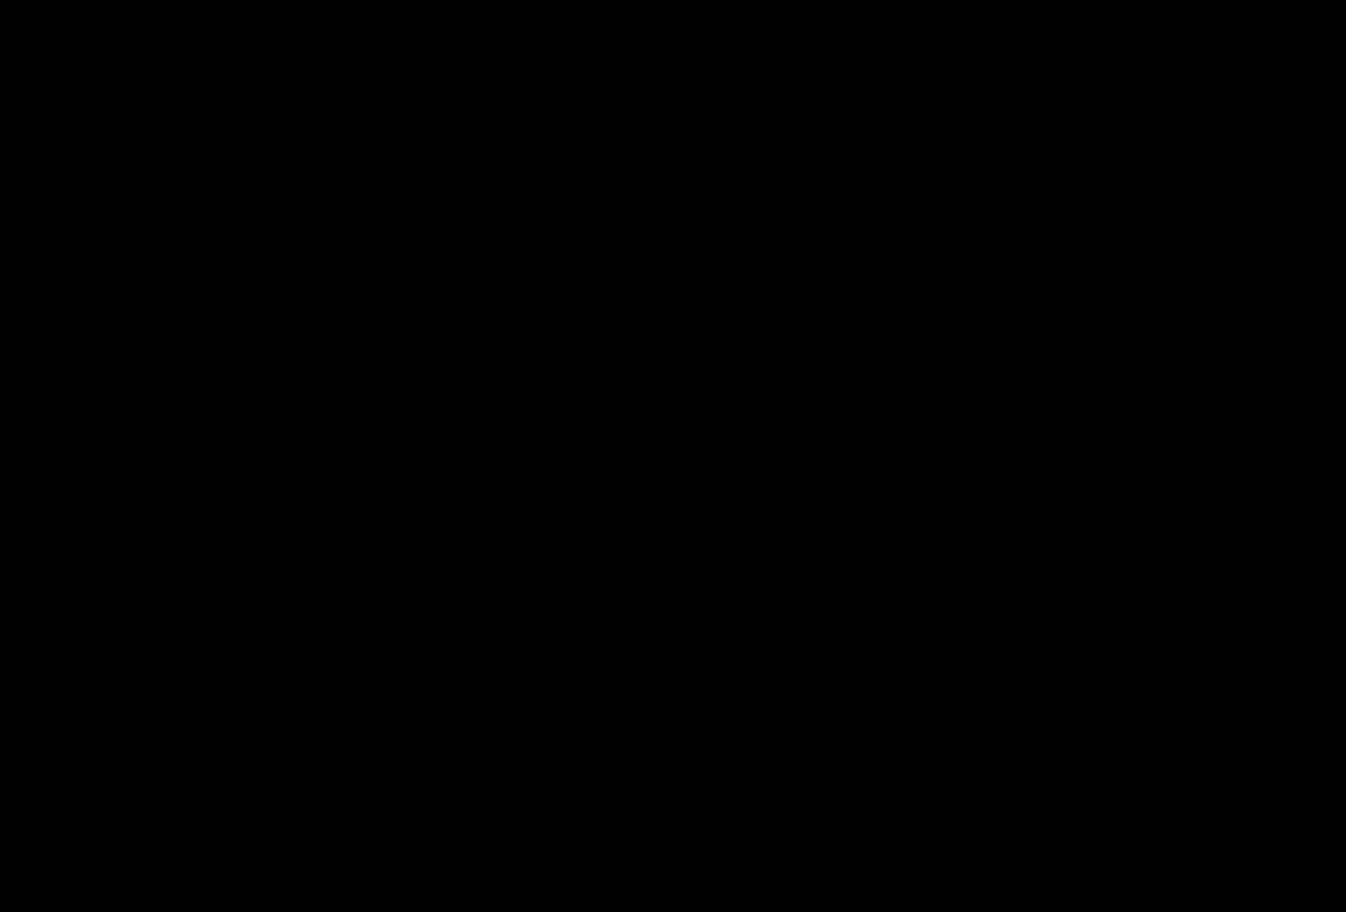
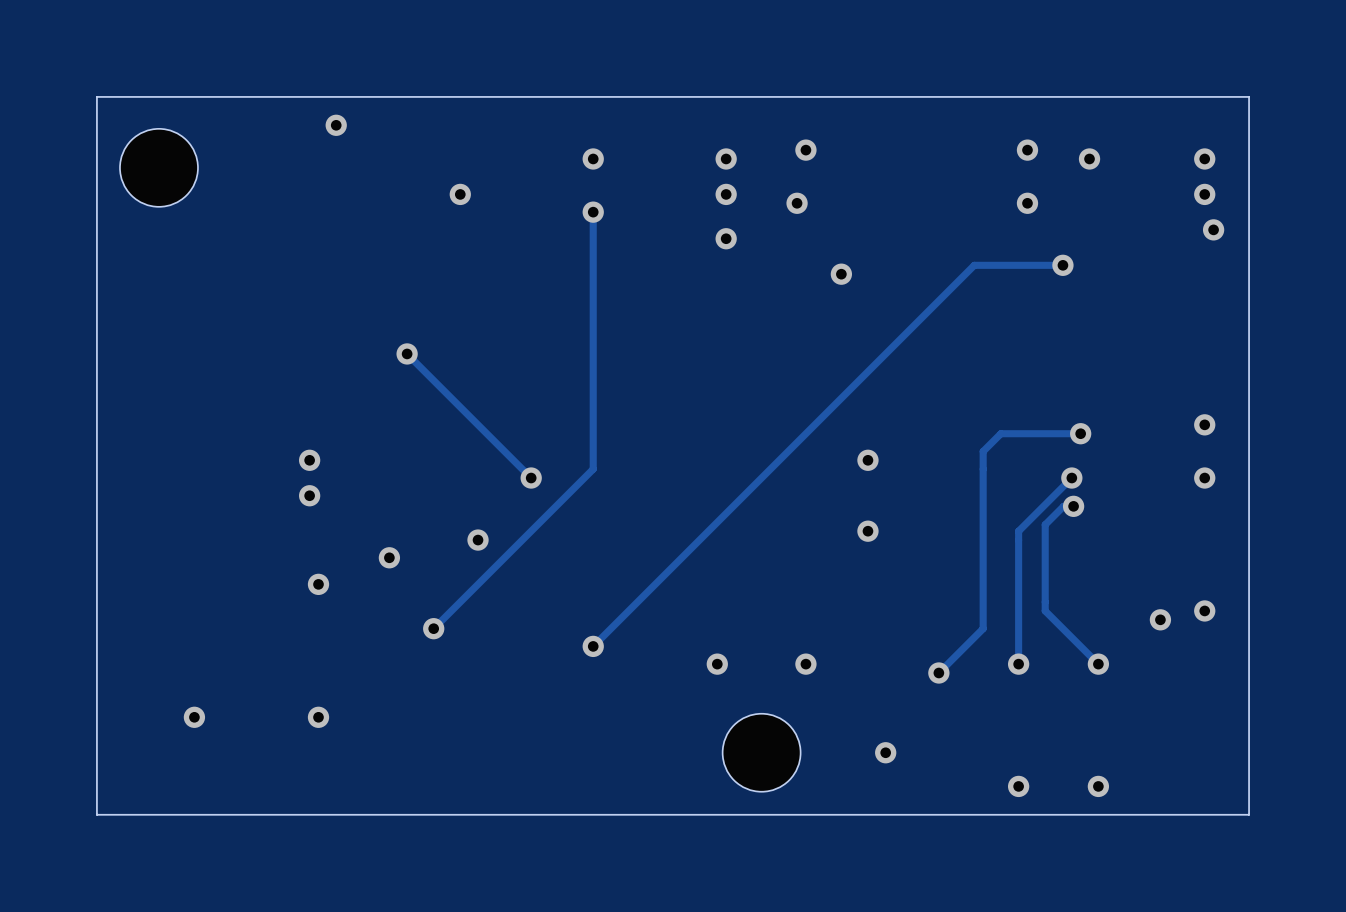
board edge: none -> (1249, 96) (96, 96) (96, 814) (1249, 814) (1249, 96)
via: none -> (336, 125)
via: none -> (805, 150)
via: none -> (1027, 150)
via: none -> (593, 158)
via: none -> (726, 158)
via: none -> (1089, 158)
via: none -> (1204, 158)
part: none -> (158, 167)
via: none -> (460, 194)
via: none -> (726, 194)
via: none -> (1204, 194)
via: none -> (797, 203)
via: none -> (1027, 203)
track: none -> (593, 212) (593, 469) (433, 628)
via: none -> (593, 212)
via: none -> (1213, 229)
via: none -> (726, 238)
track: none -> (1062, 265) (974, 265) (593, 646)
via: none -> (1062, 265)
via: none -> (841, 274)
track: none -> (407, 353) (531, 478)
via: none -> (407, 353)
via: none -> (1204, 424)
track: none -> (1080, 433) (1000, 433) (983, 451) (983, 628) (938, 672)
via: none -> (1080, 433)
via: none -> (309, 460)
via: none -> (867, 460)
via: none -> (531, 478)
track: none -> (1071, 478) (1018, 531) (1018, 664)
via: none -> (1071, 478)
via: none -> (1204, 478)
via: none -> (309, 495)
track: none -> (1073, 506) (1063, 506) (1045, 524) (1045, 610) (1098, 664)
via: none -> (1073, 506)
via: none -> (867, 531)
via: none -> (478, 540)
via: none -> (389, 557)
via: none -> (318, 584)
via: none -> (1204, 610)
via: none -> (1160, 619)
via: none -> (433, 628)
via: none -> (593, 646)
via: none -> (717, 664)
via: none -> (805, 664)
via: none -> (1018, 664)
via: none -> (1098, 664)
via: none -> (938, 672)
via: none -> (194, 717)
via: none -> (318, 717)
part: none -> (761, 752)
via: none -> (885, 752)
via: none -> (1018, 786)
via: none -> (1098, 786)

